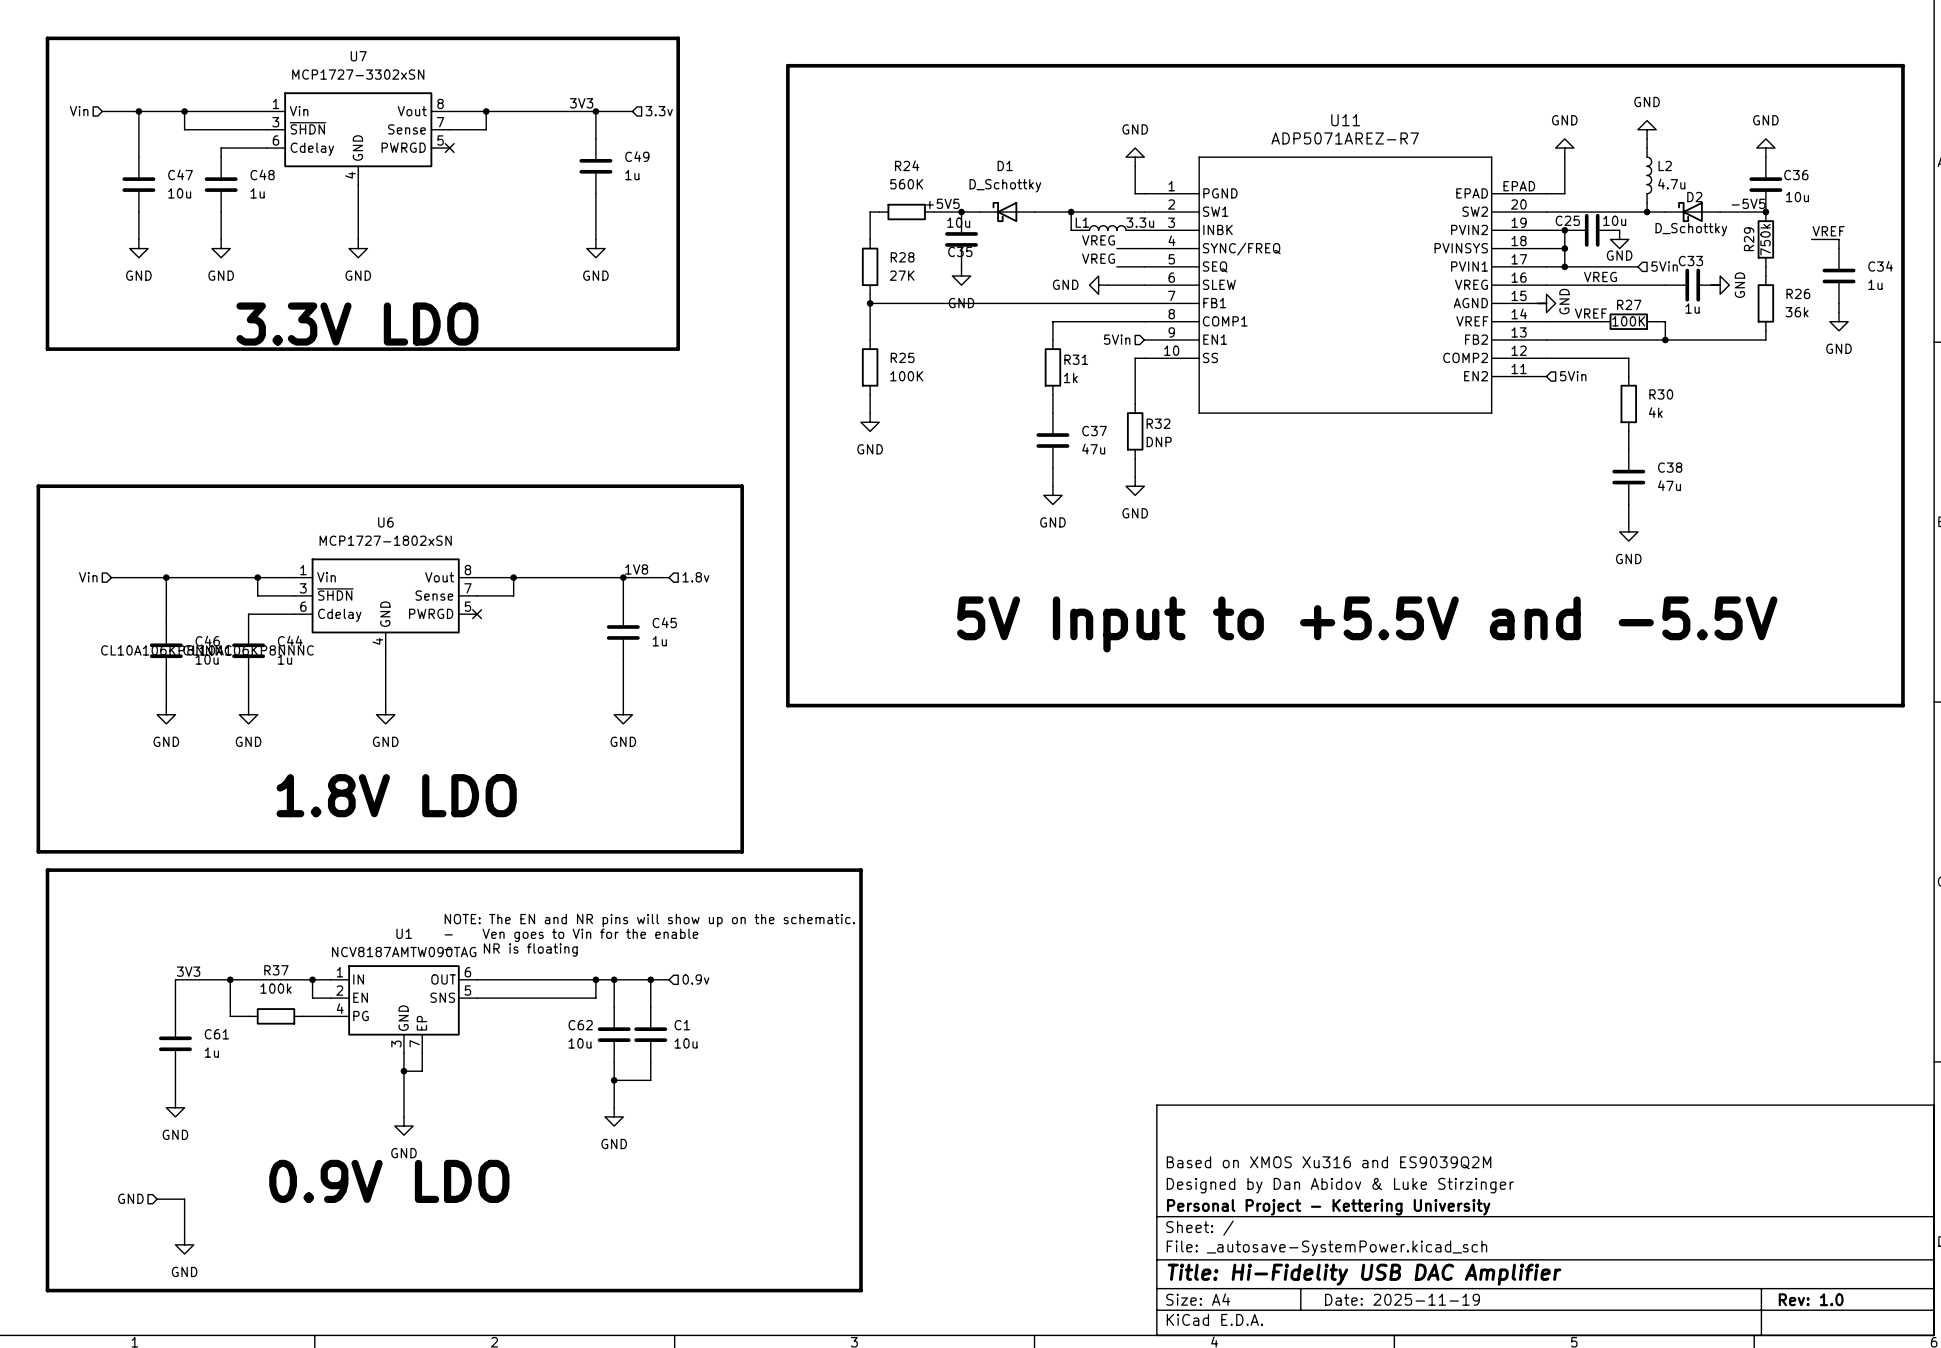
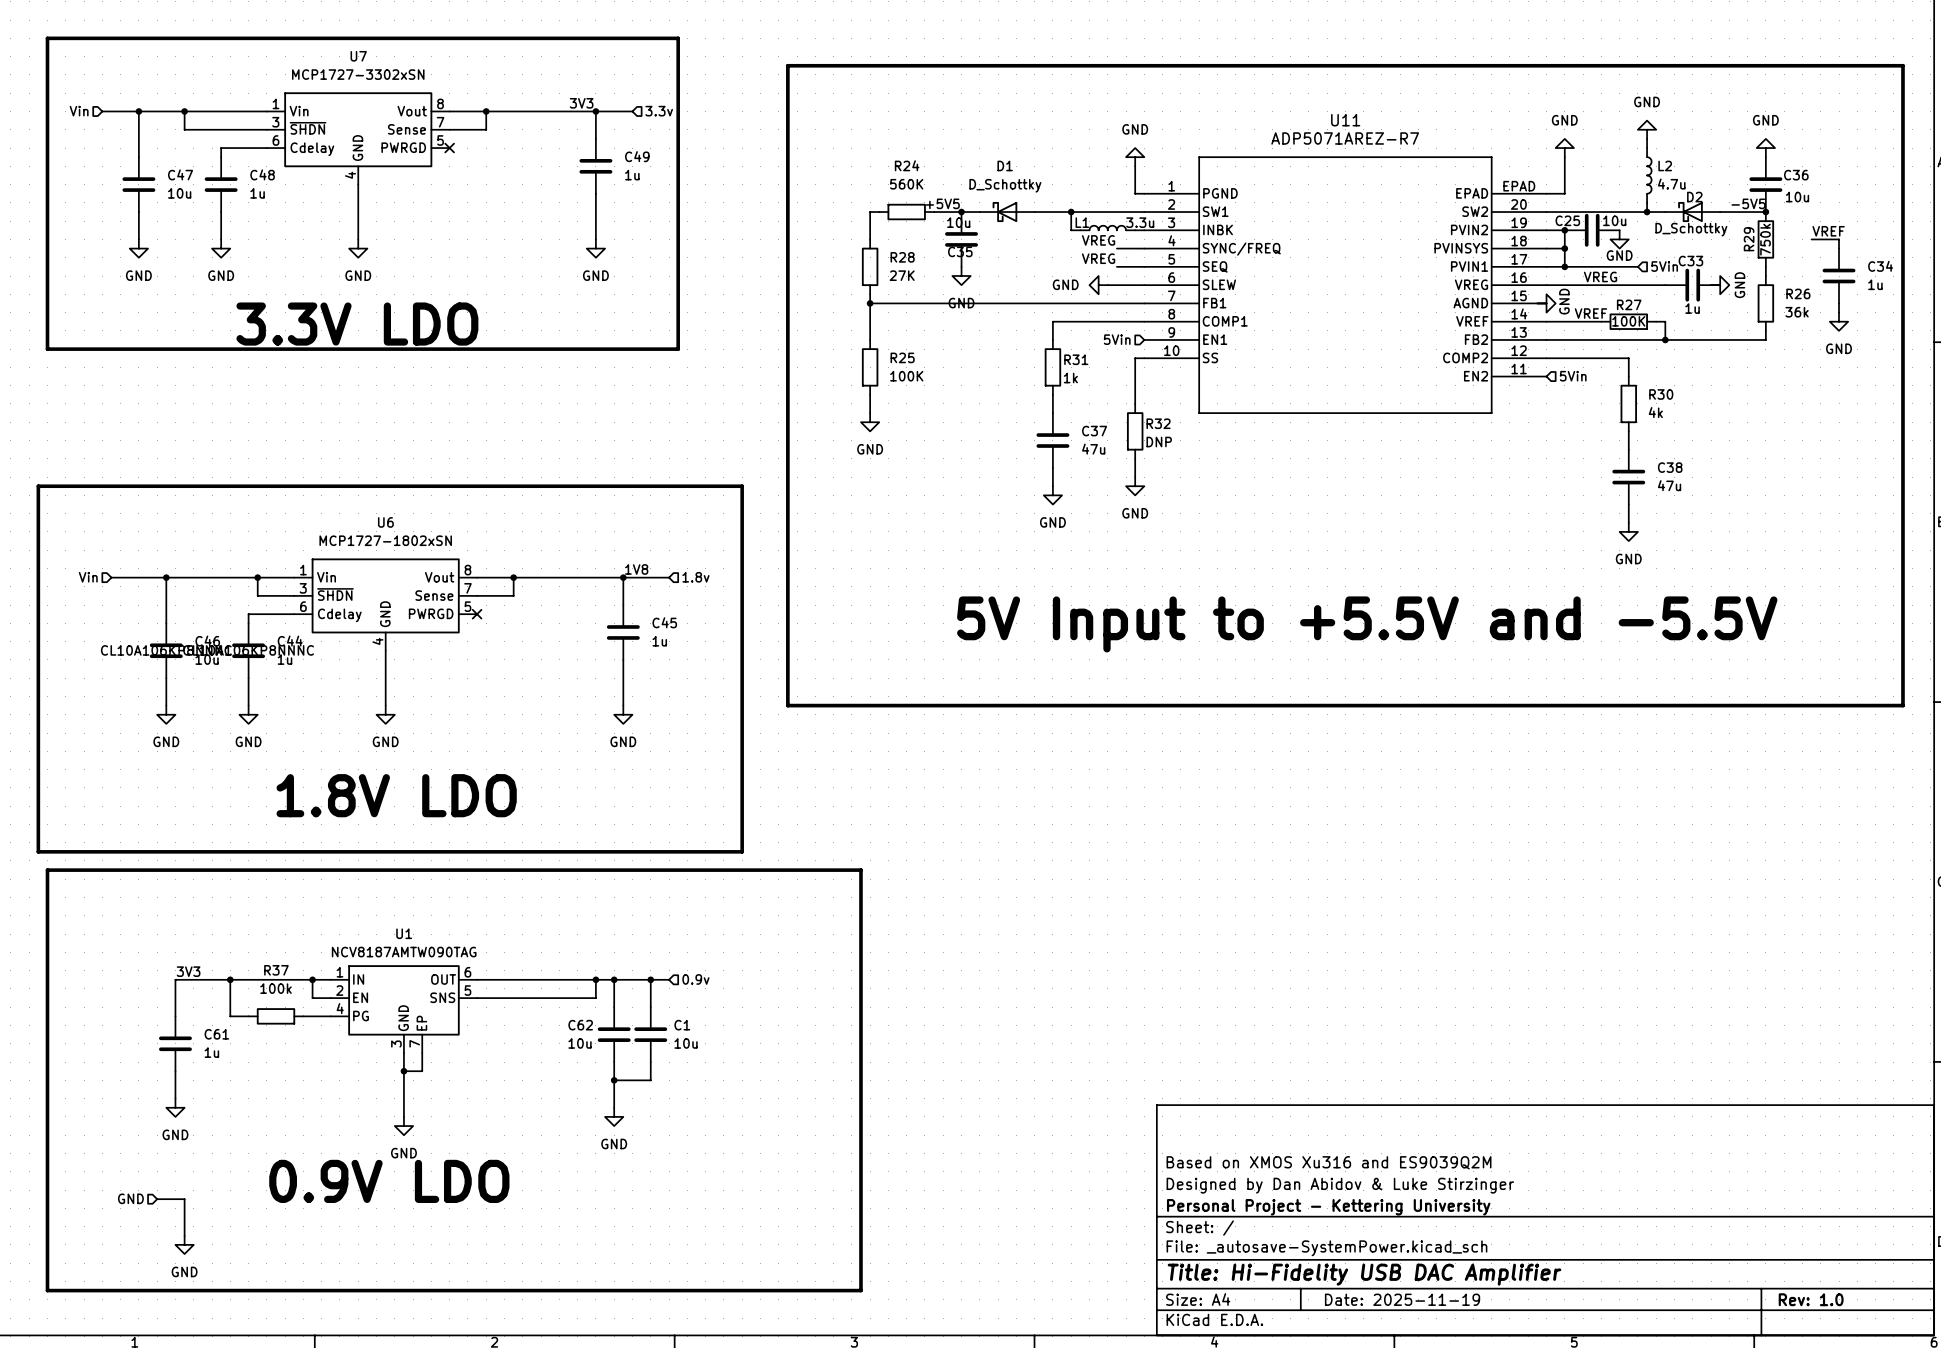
text: NOTE: The EN and NR pins will show up on the schematic. (649, 920) -> none
text: - Ven goes to Vin for the enable (571, 935) -> none
text: - NR is floating (511, 950) -> none

